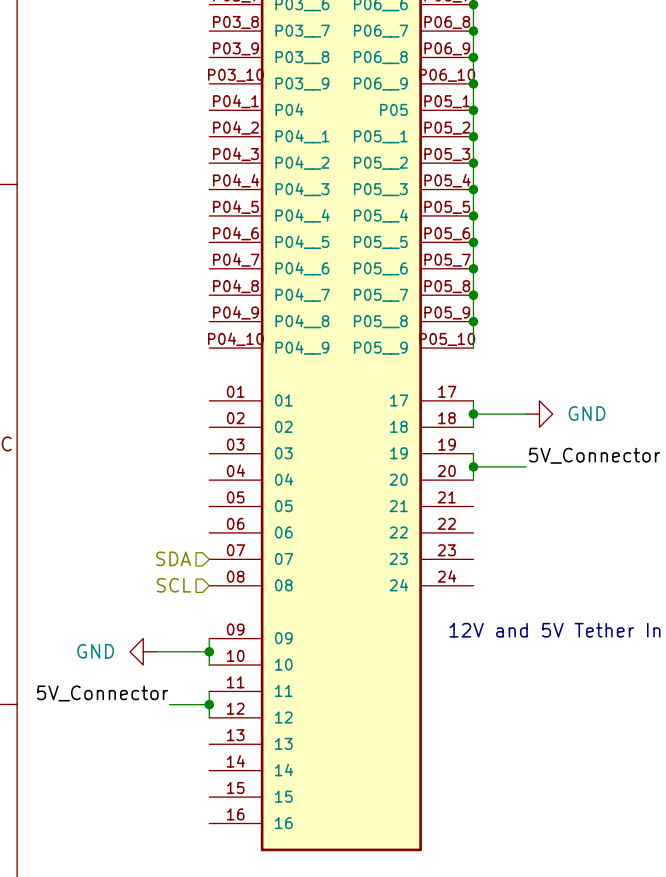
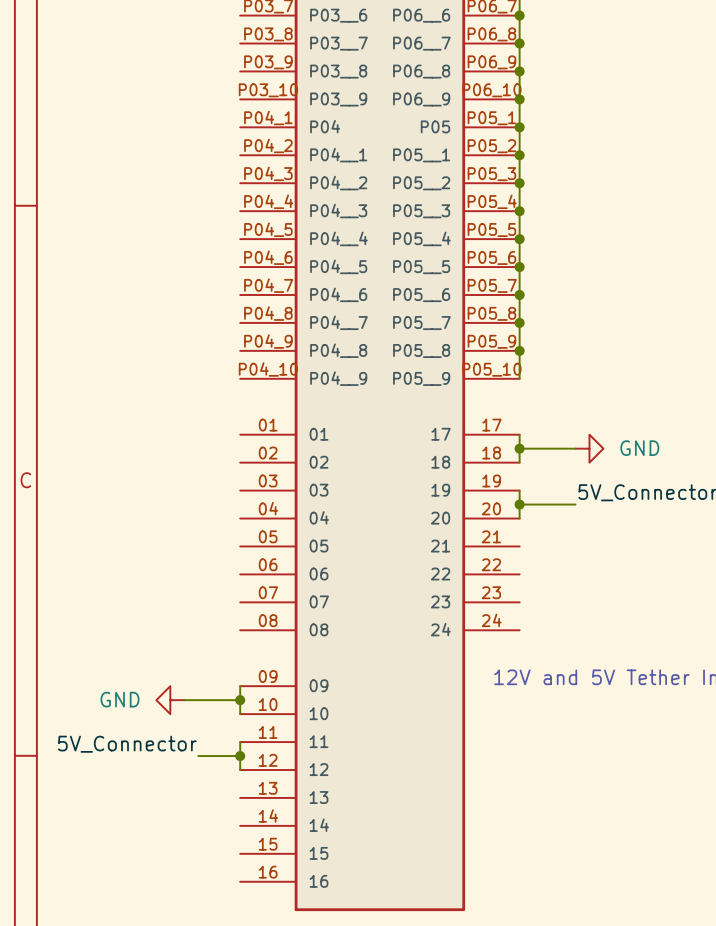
hierarchical label: SDA (173, 558) -> none
hierarchical label: SCL (173, 585) -> none

